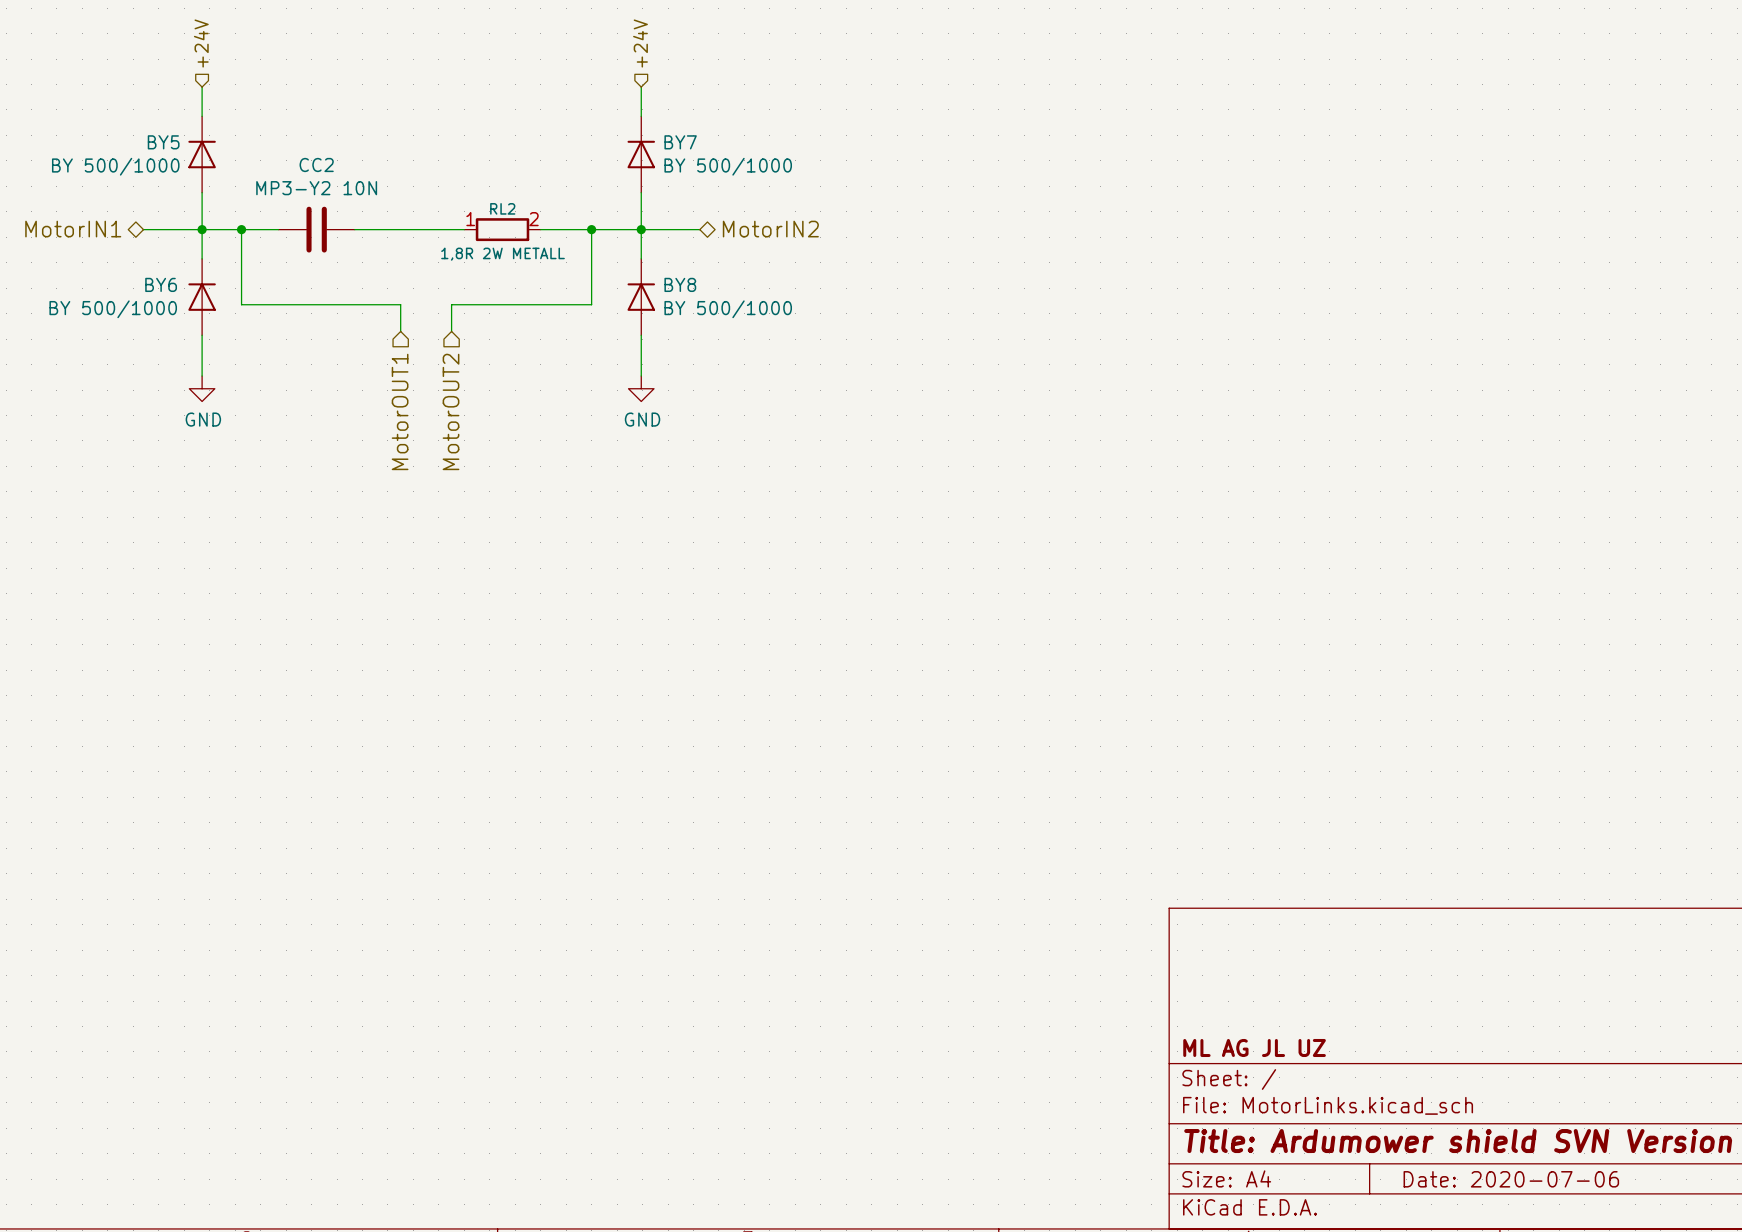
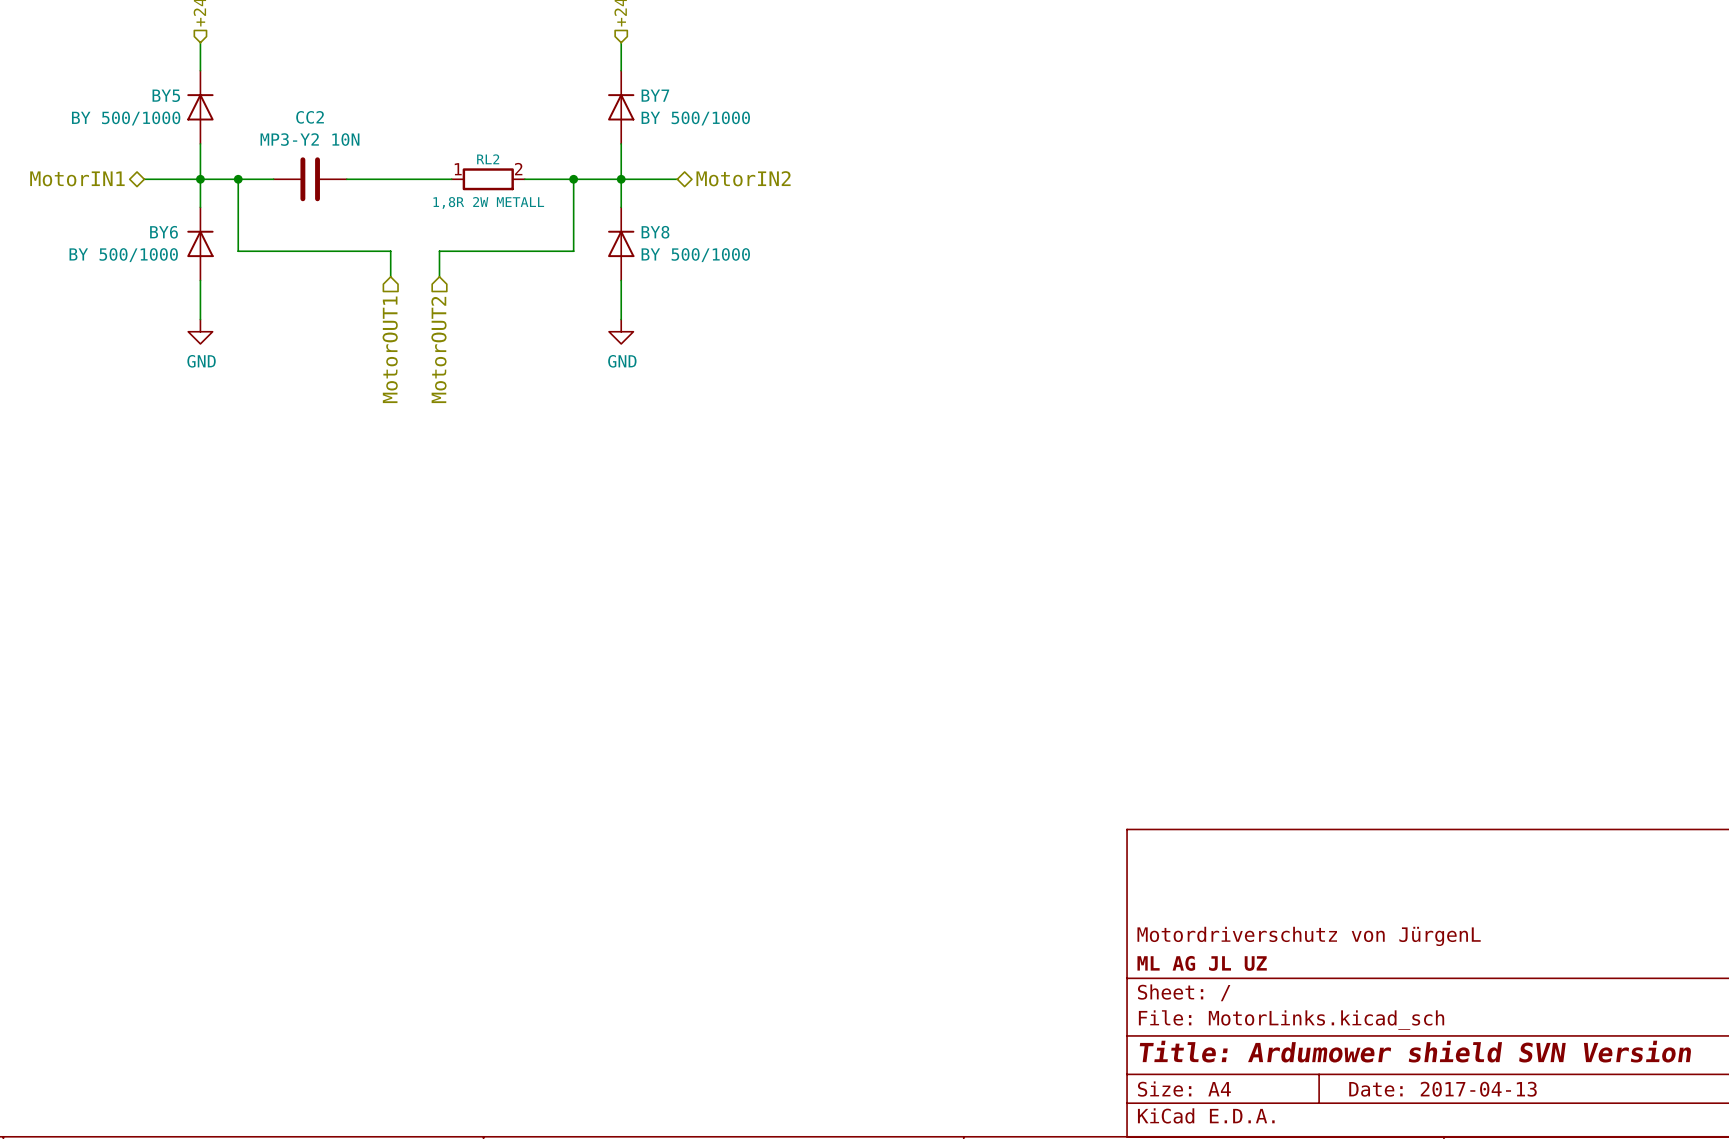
title block: none -> Motordriverschutz von JürgenL (1309, 936)
title block: Date: 2020-07-06 (1511, 1179) -> Date: 2017-04-13 (1443, 1089)

